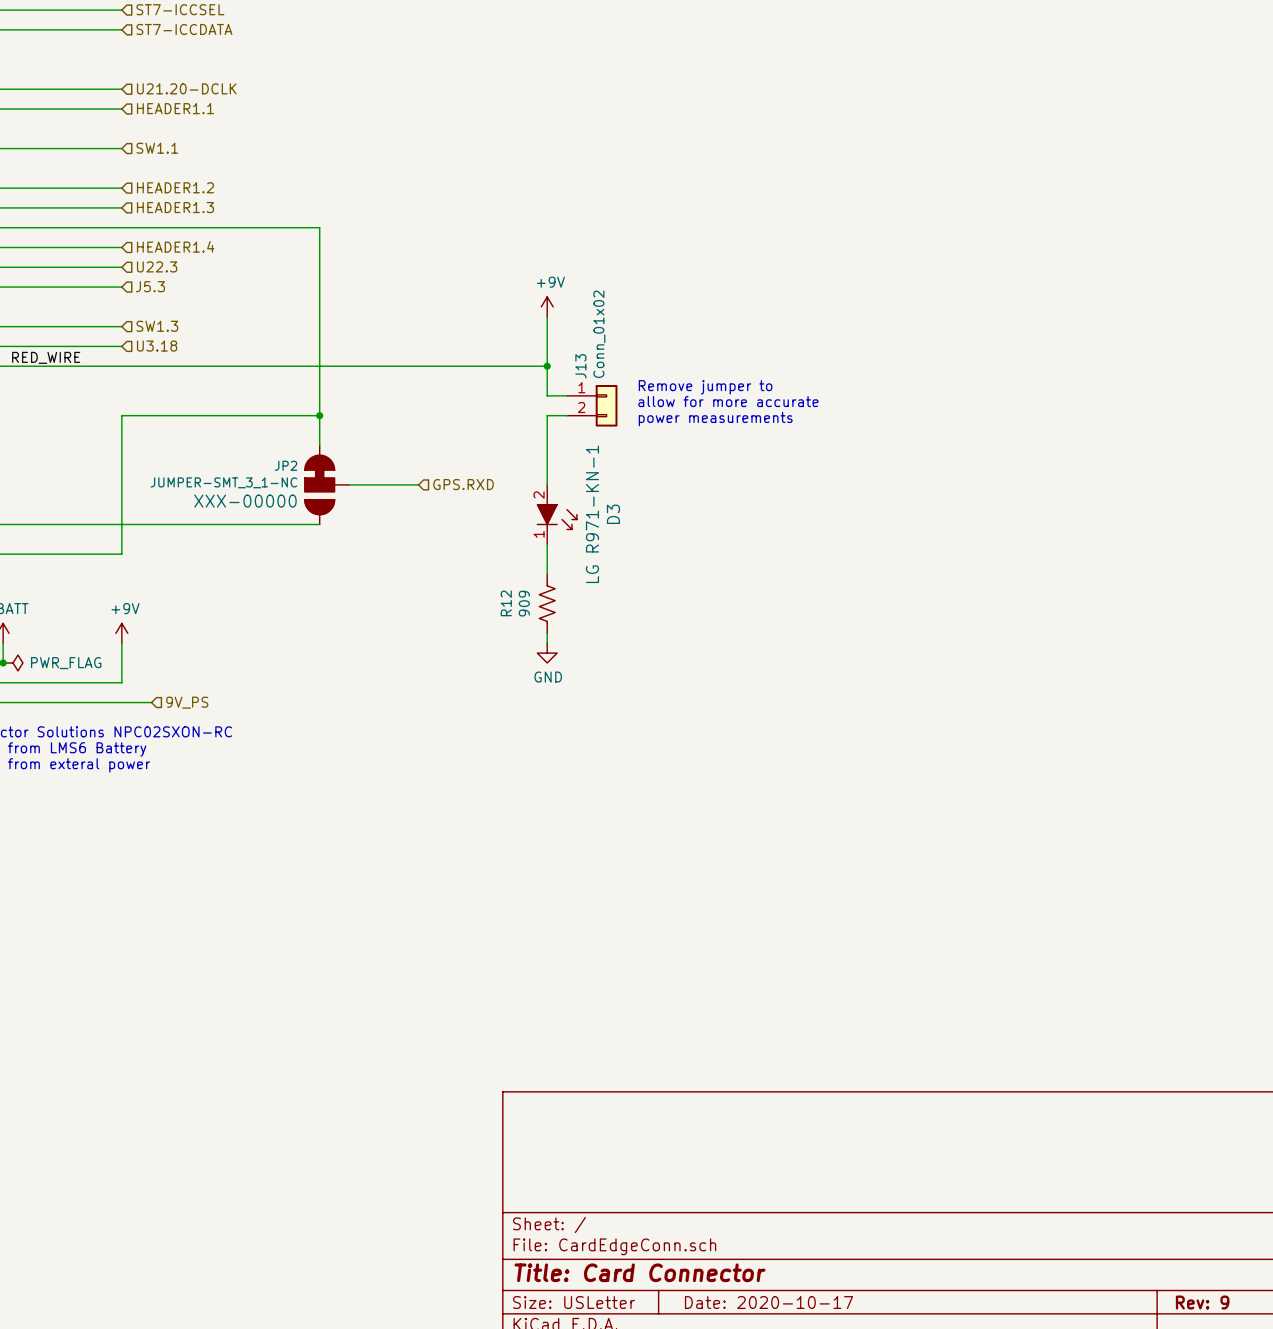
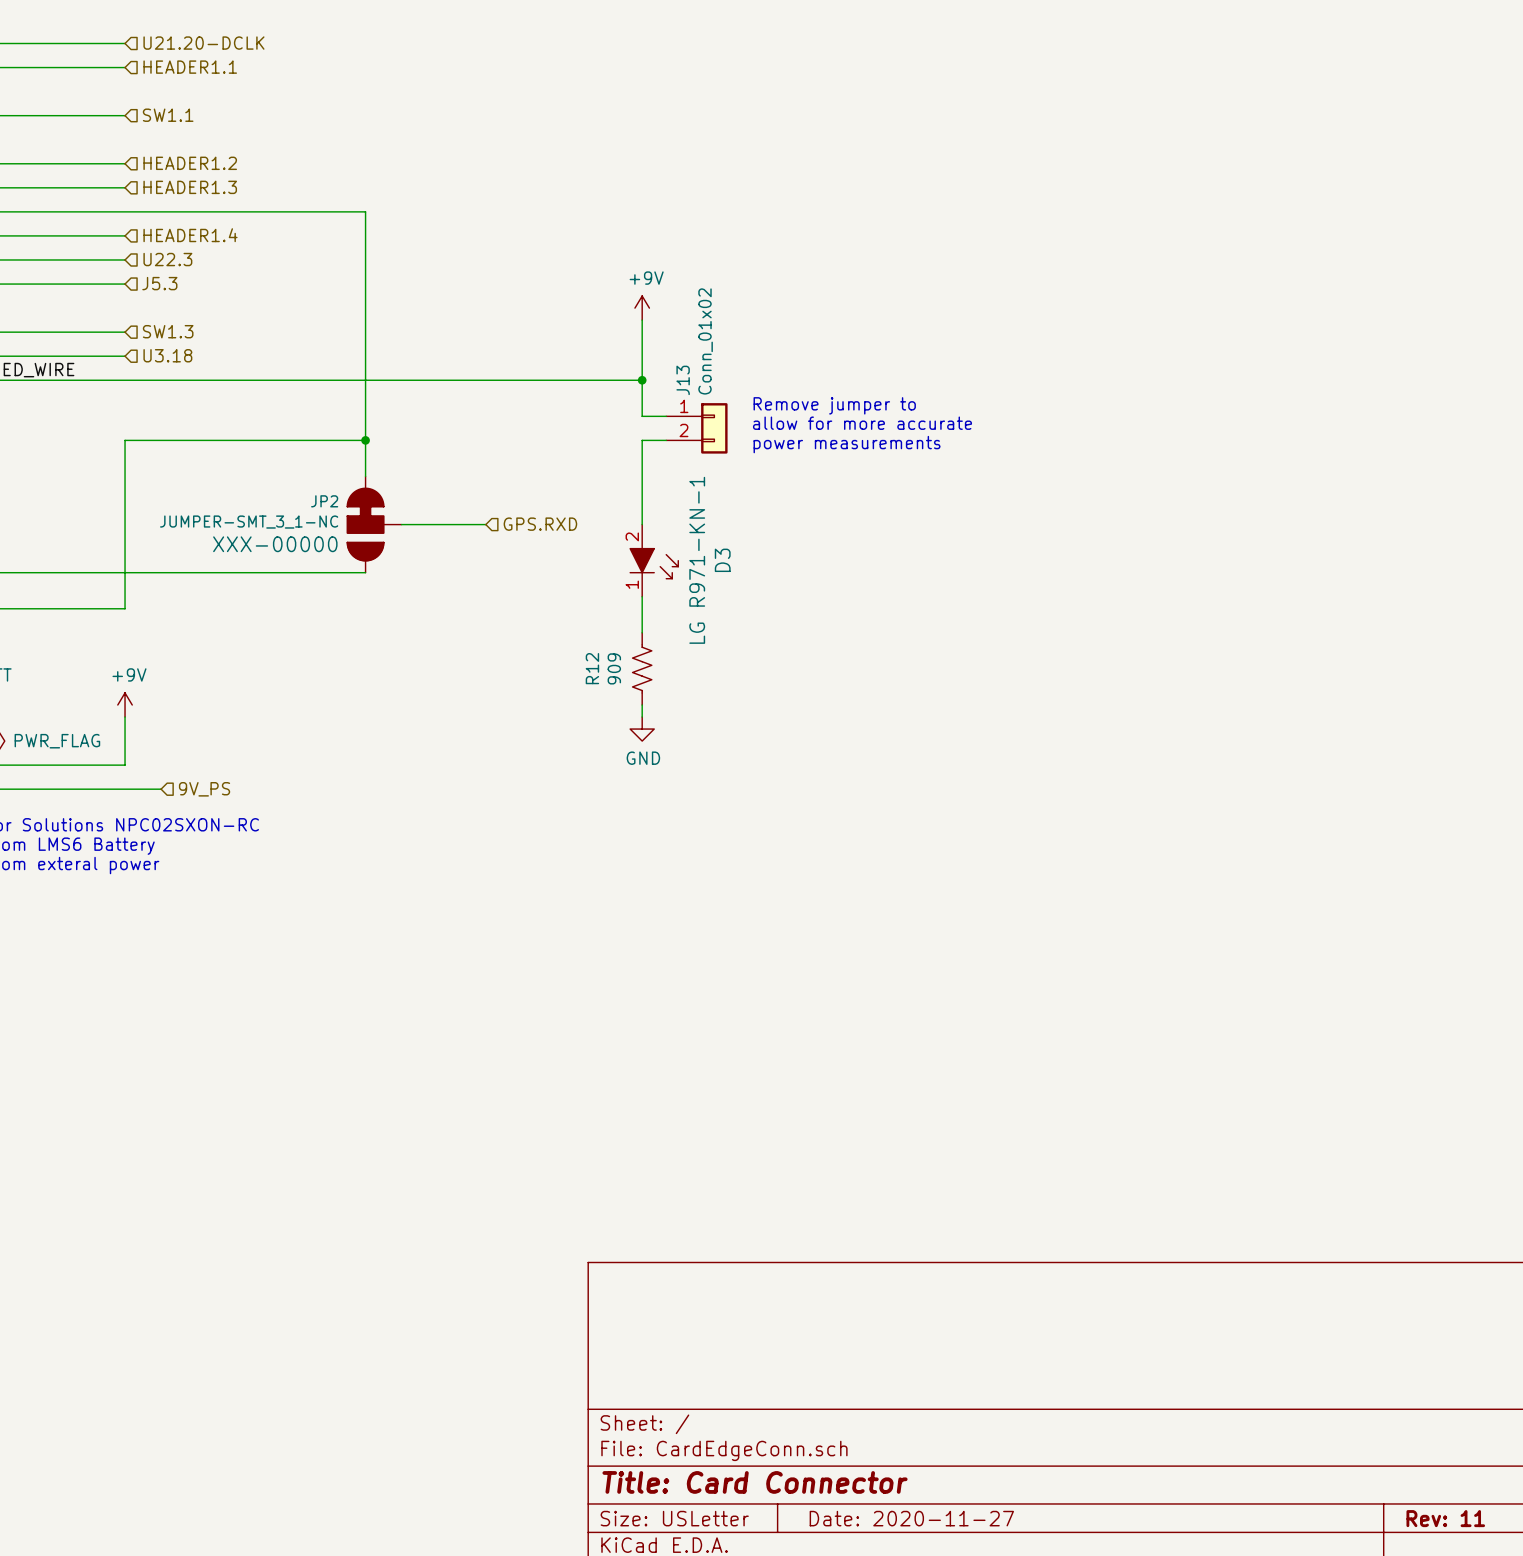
title block: Date: 2020-10-17 (769, 1302) -> Date: 2020-11-27 (911, 1518)
title block: Rev: 9 (1202, 1302) -> Rev: 11 (1445, 1518)

